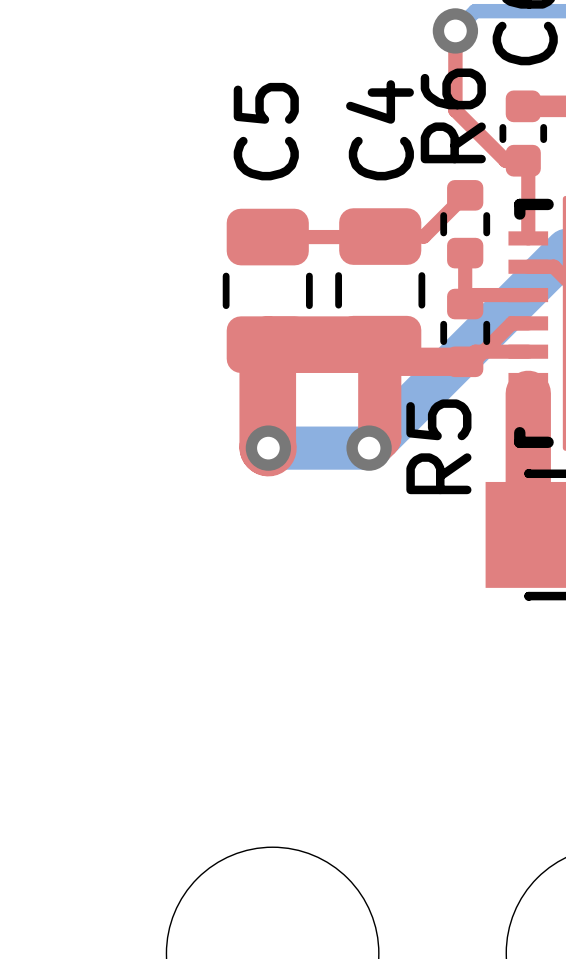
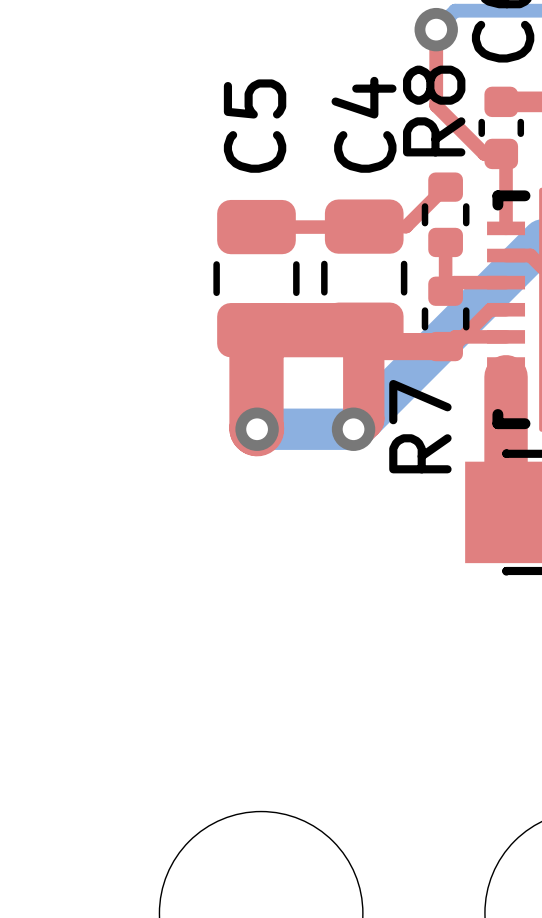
R6 name: R6 (453, 115) -> R8 (434, 111)
R5 name: R5 (438, 446) -> R7 (420, 426)

